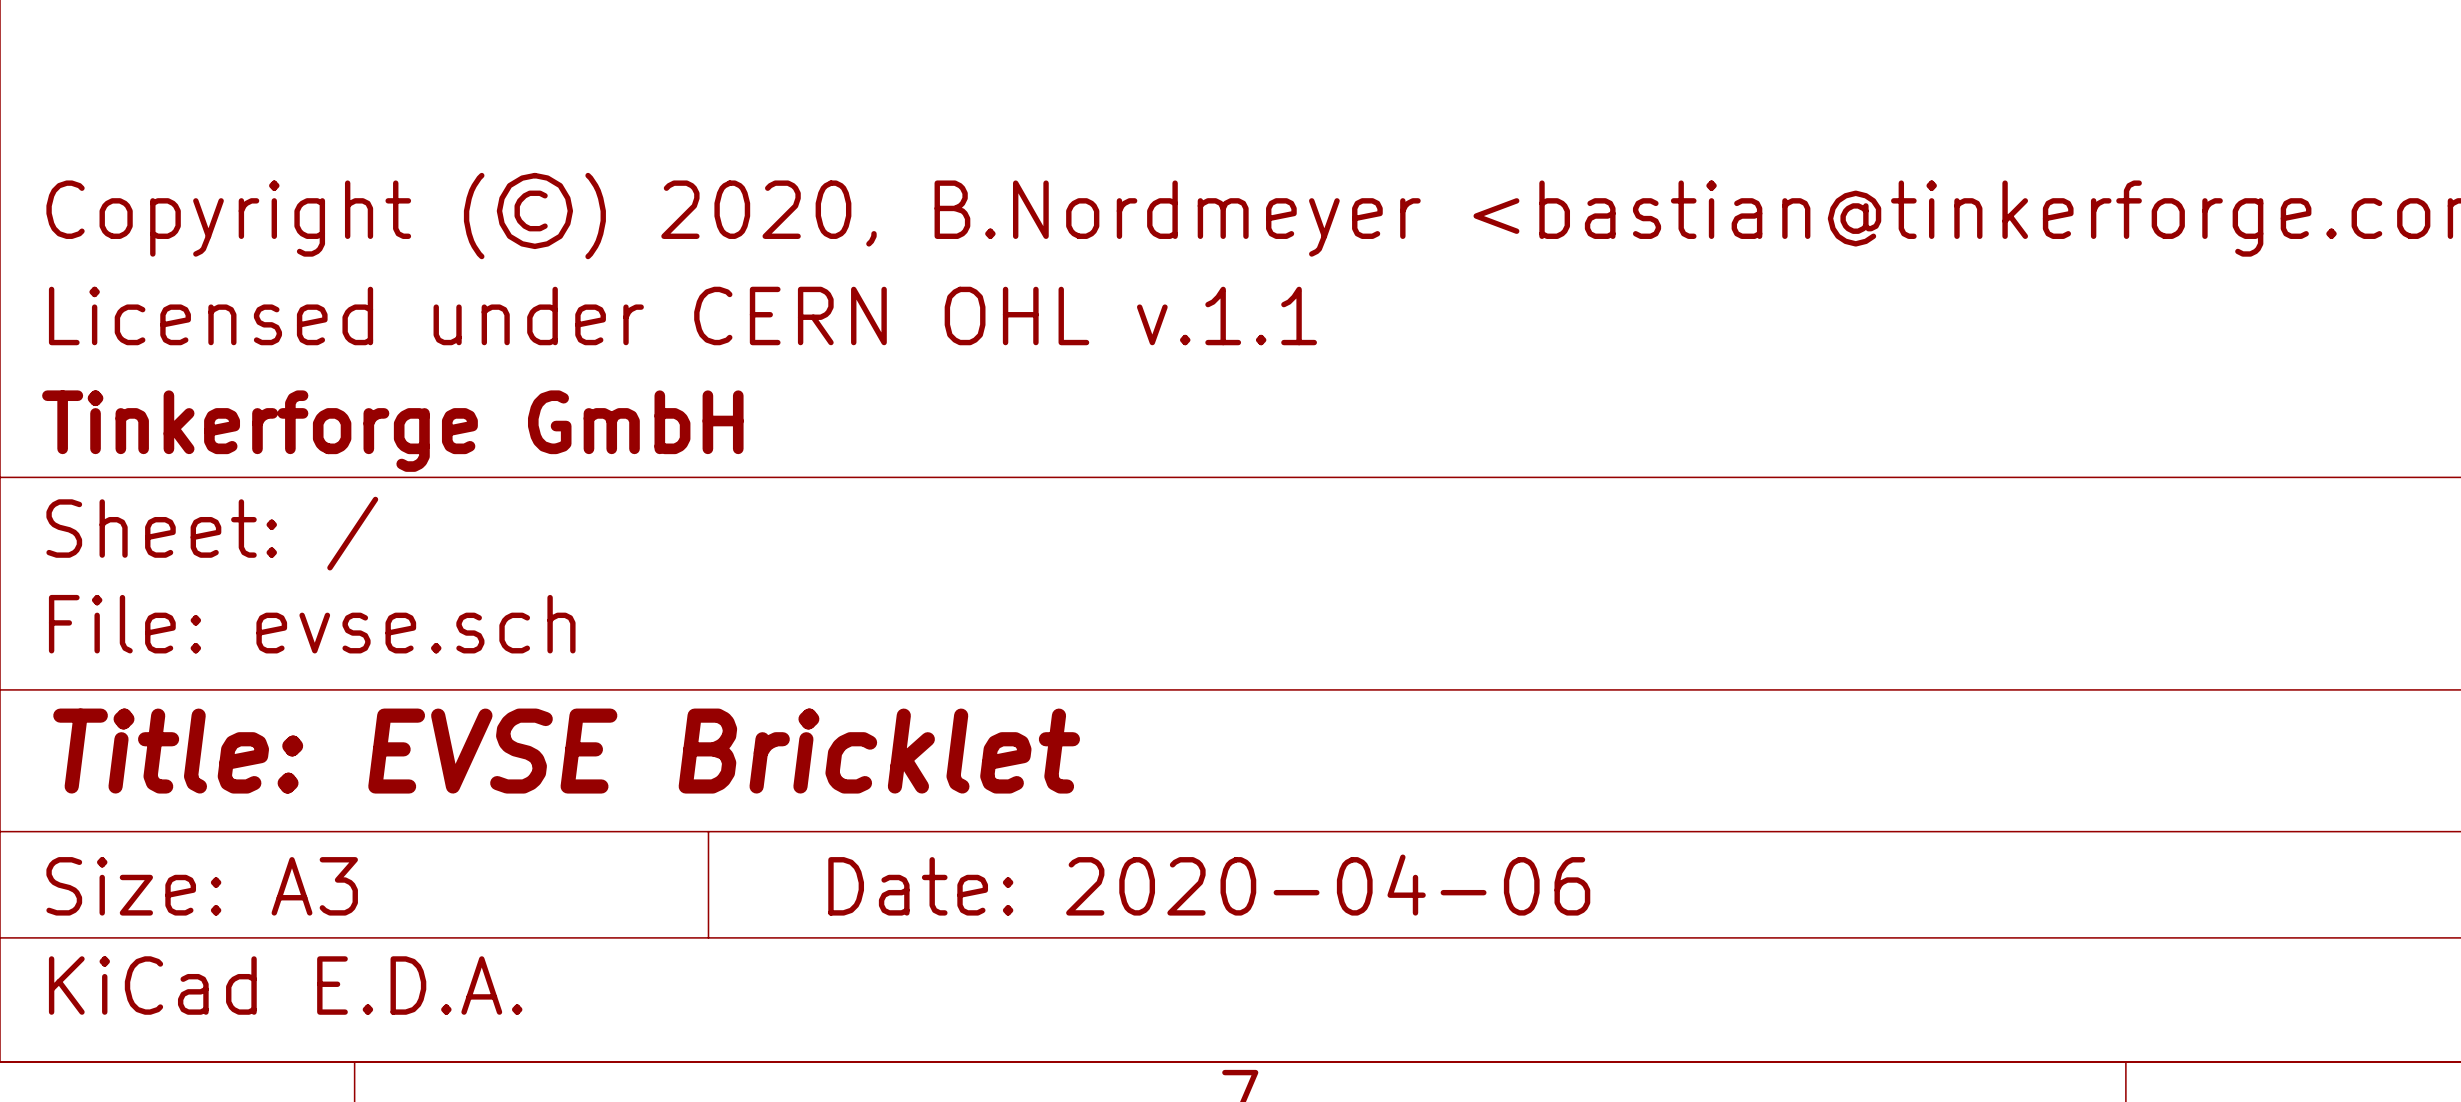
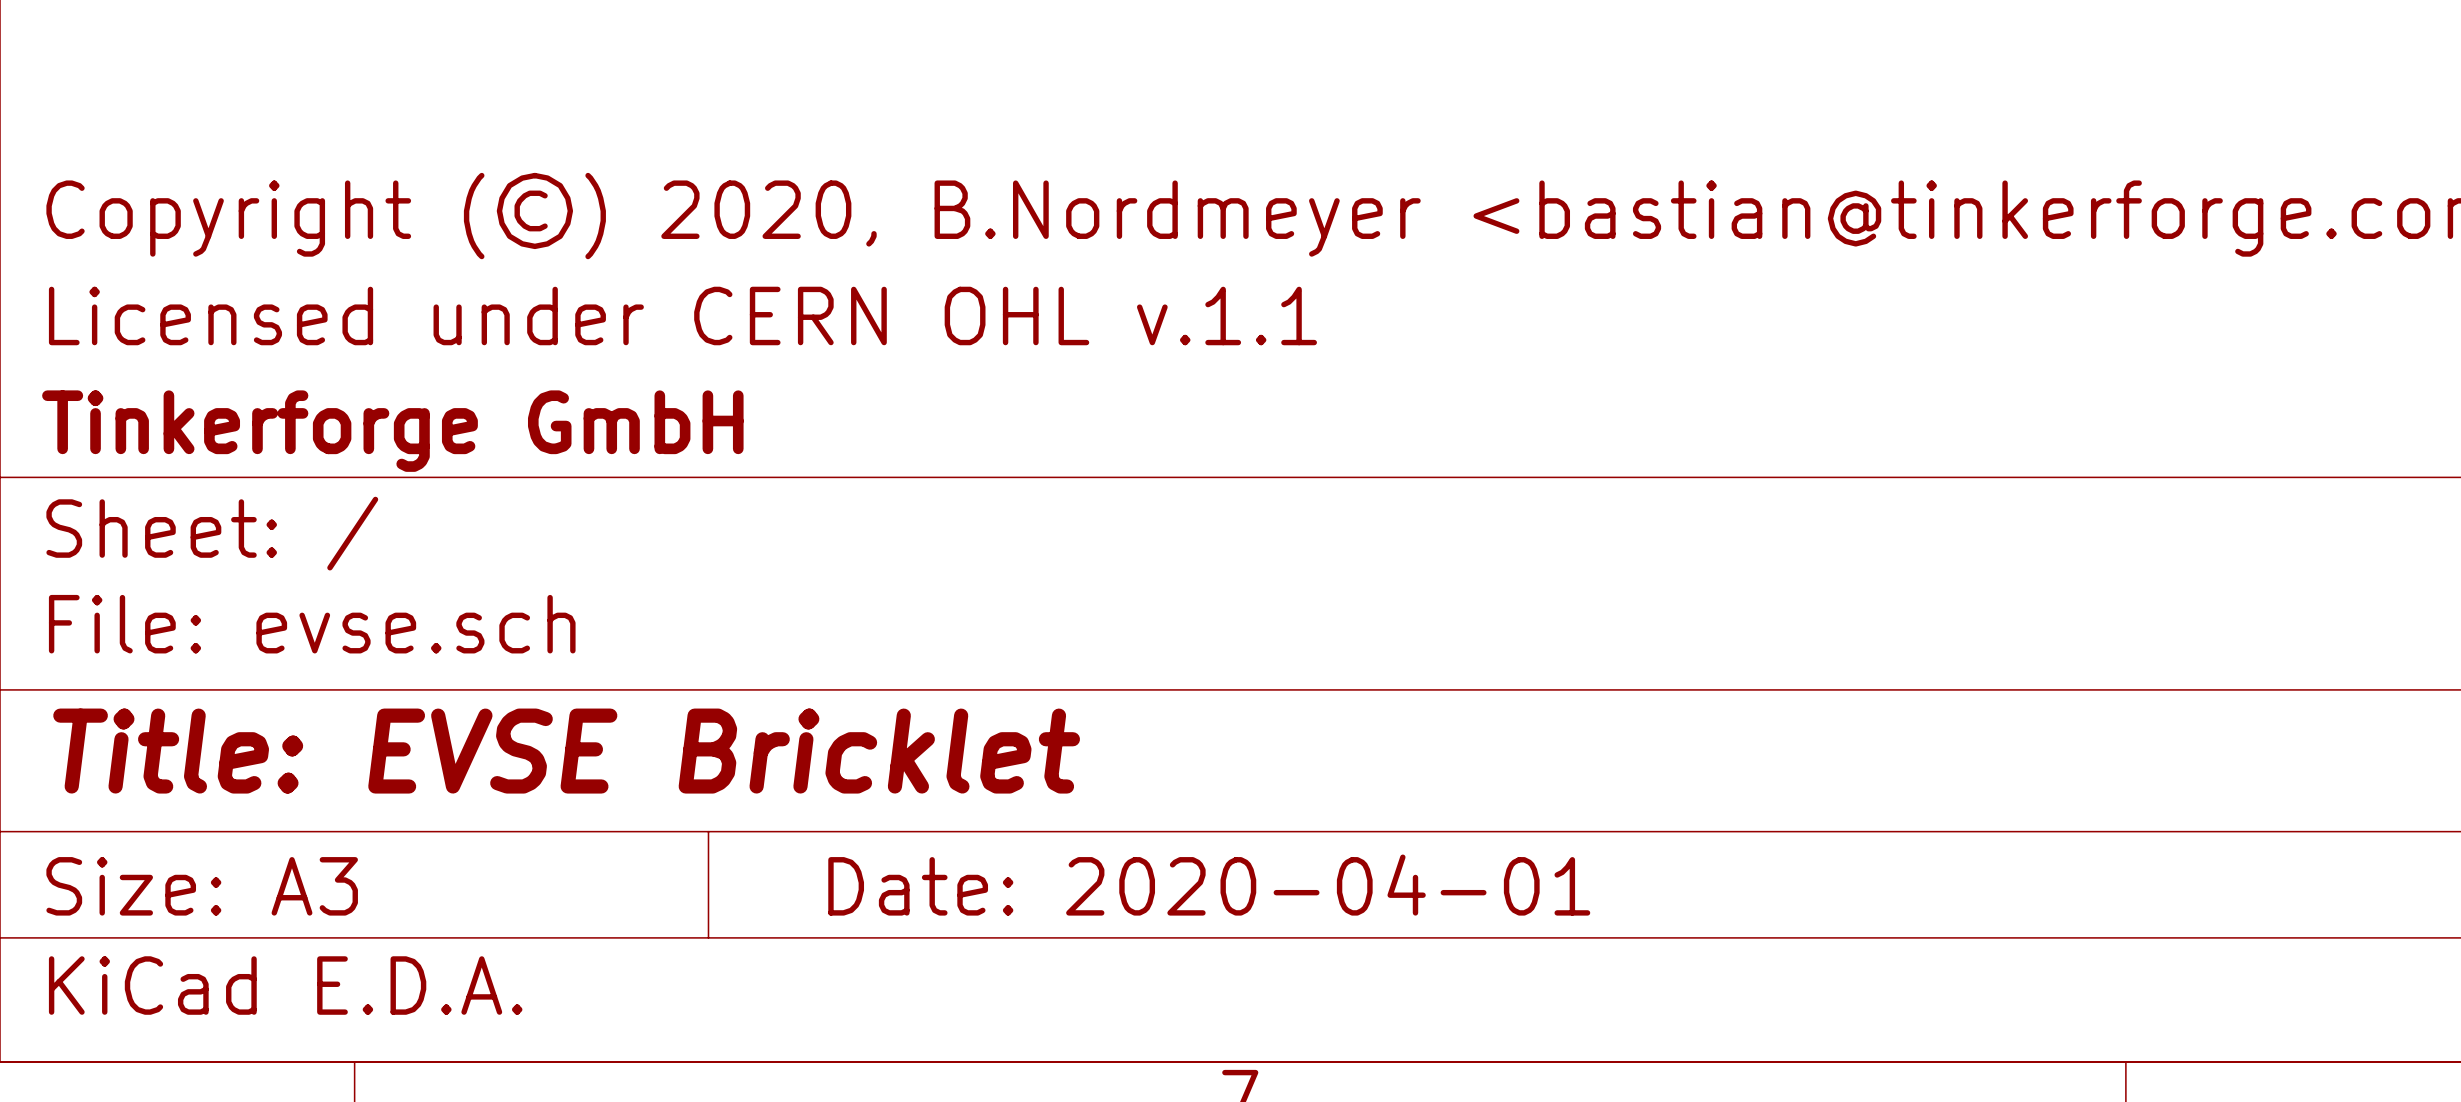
title block: Date: 2020-04-06 (1209, 885) -> Date: 2020-04-01 (1209, 885)

